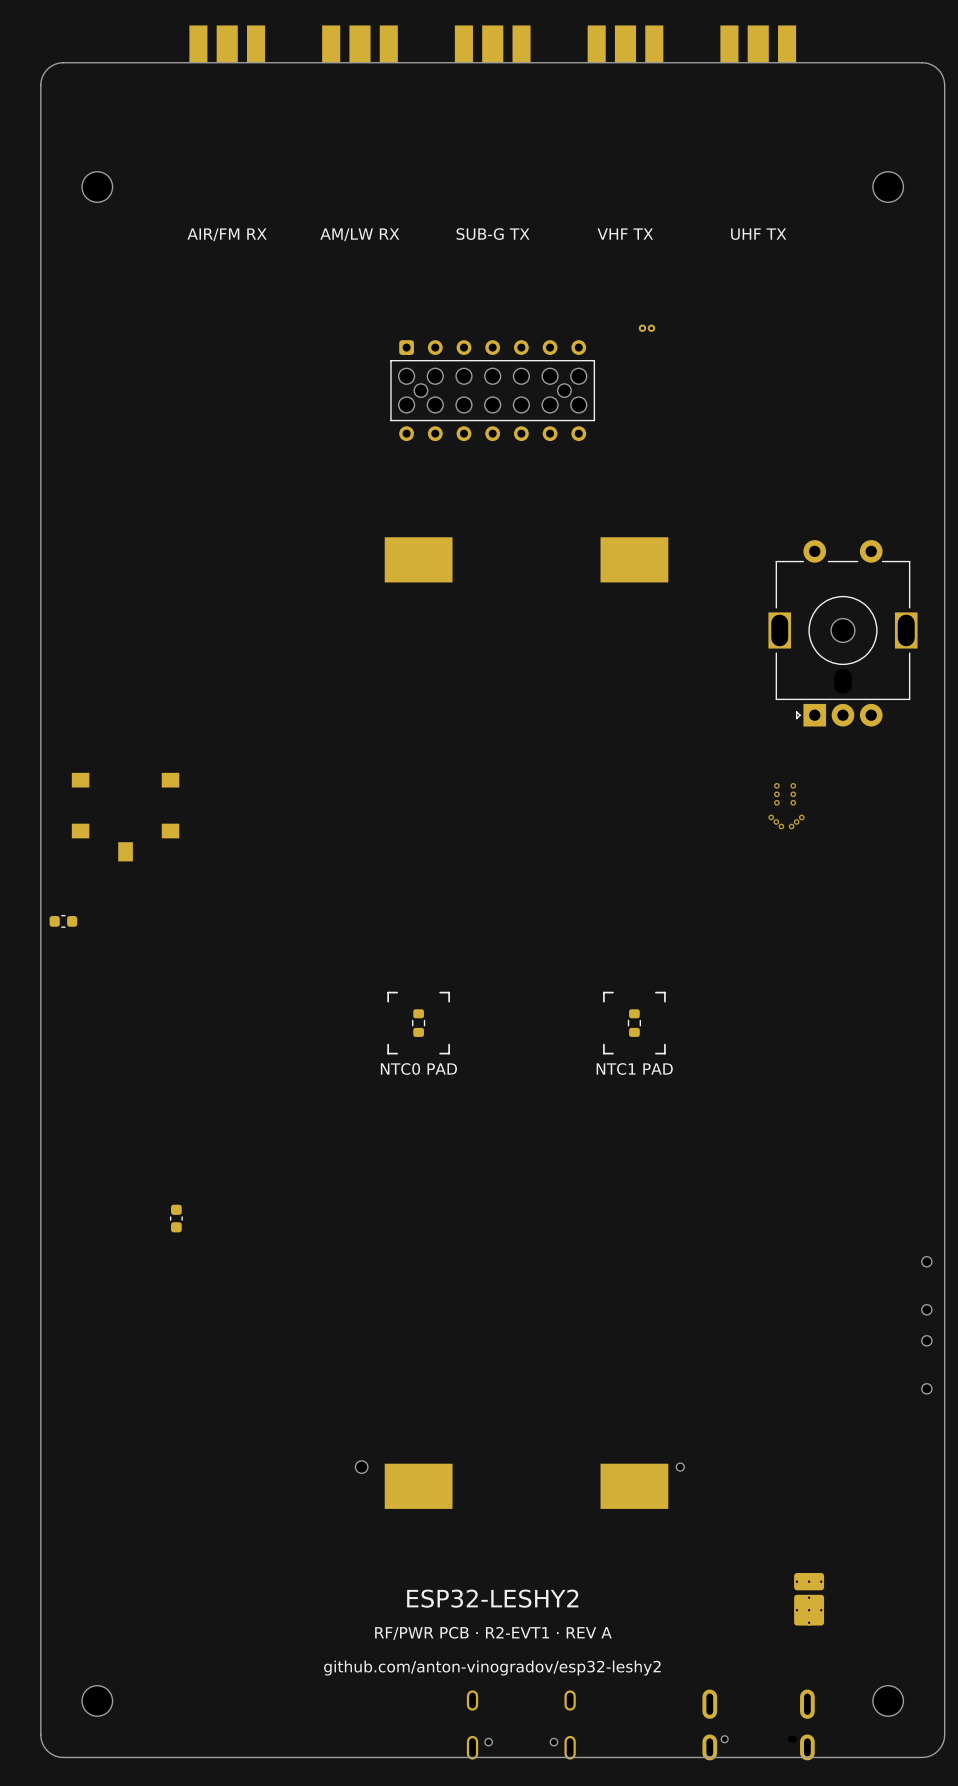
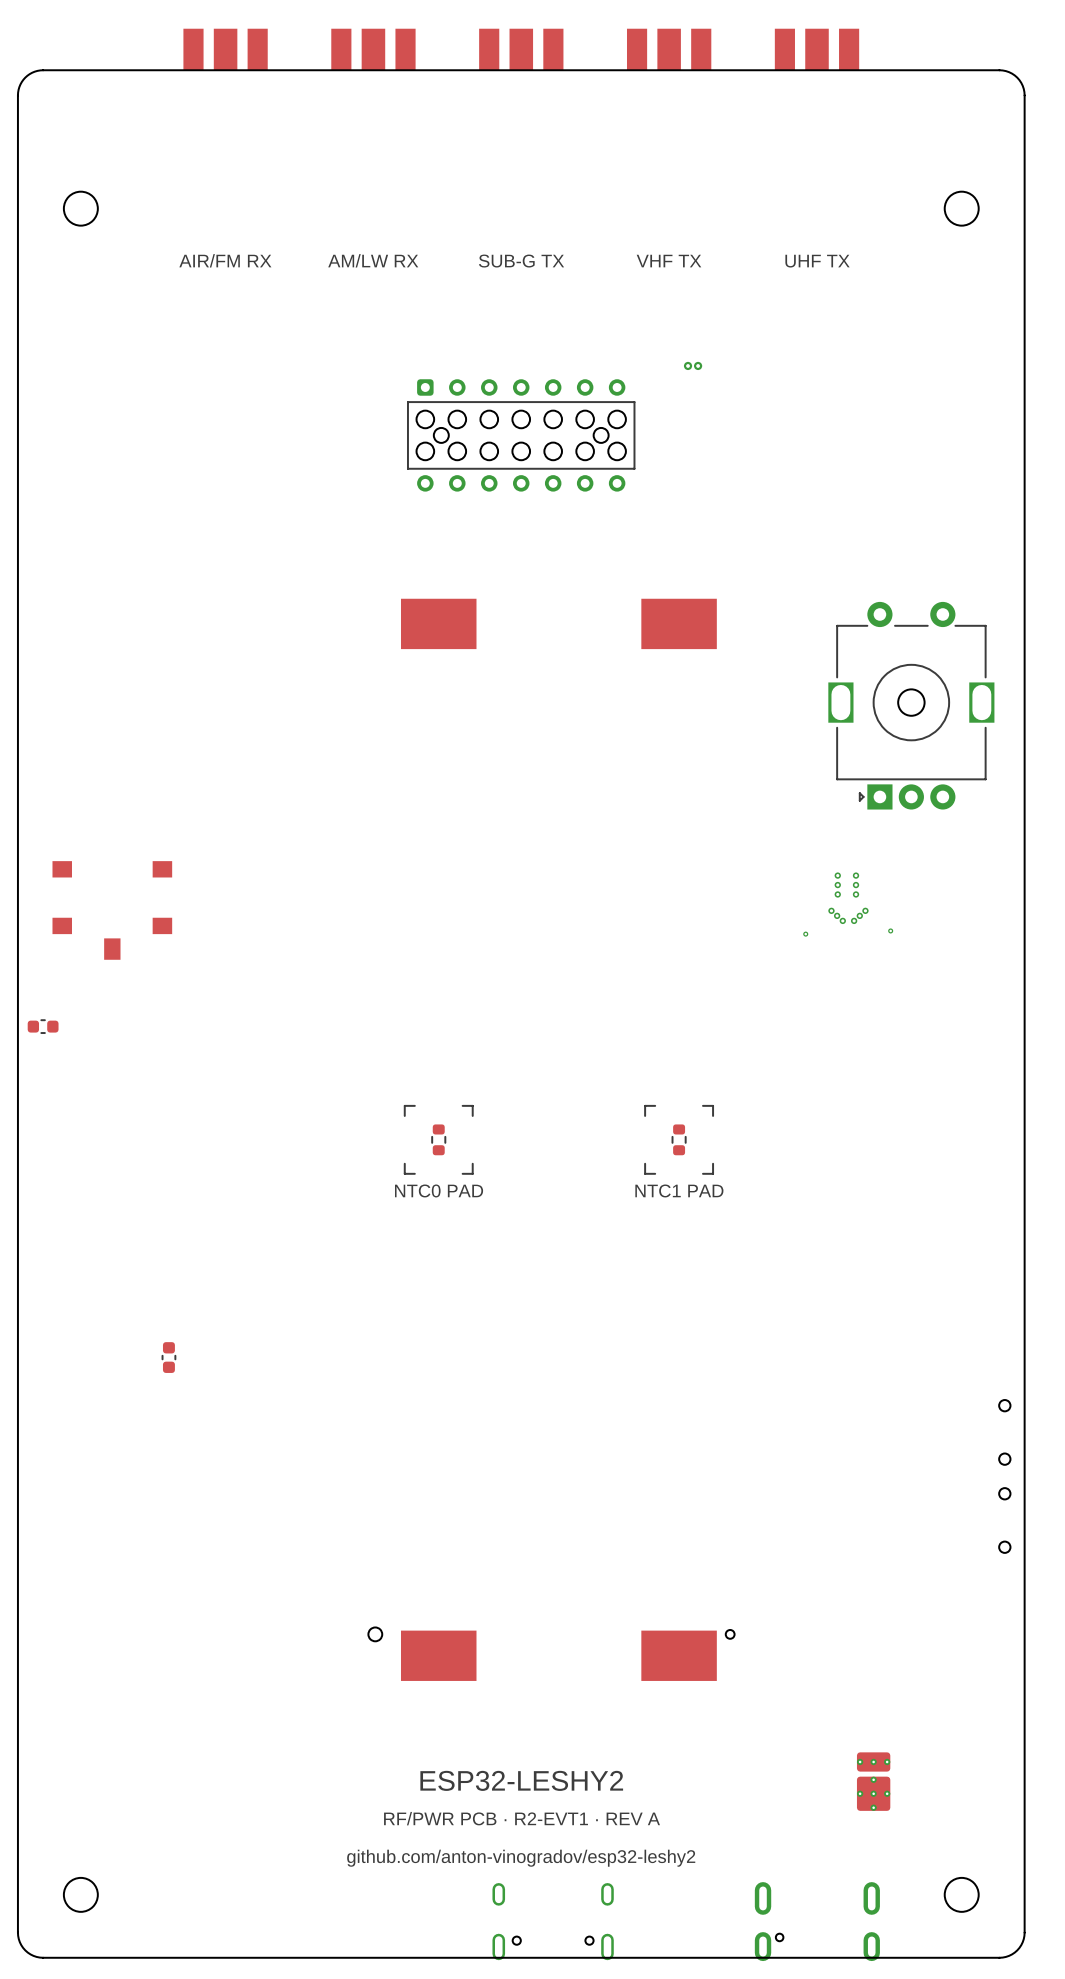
via: none -> (890, 930)
via: none -> (805, 934)

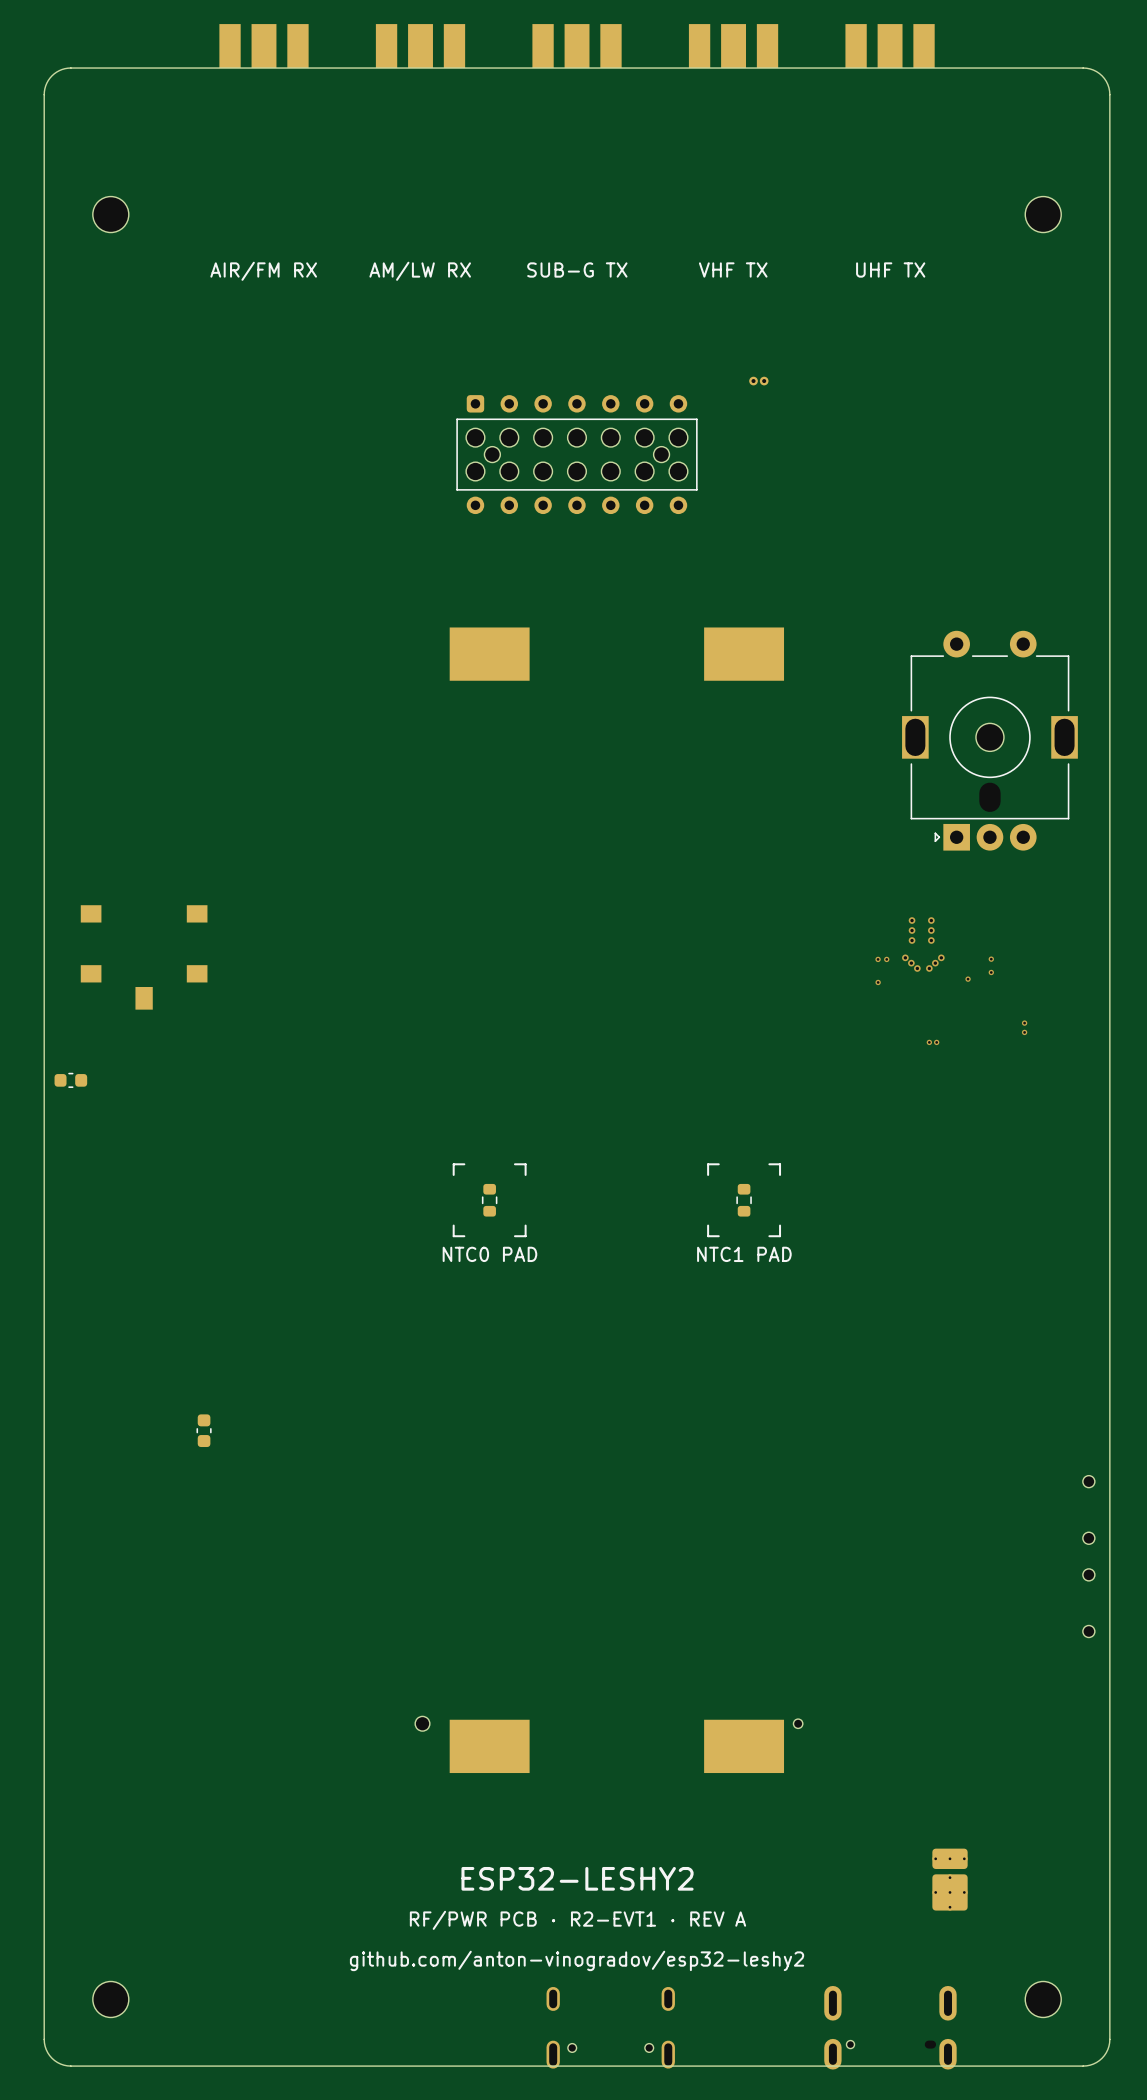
via: none -> (878, 959)
via: none -> (886, 959)
via: none -> (991, 959)
via: none -> (991, 972)
via: none -> (1024, 1023)
via: none -> (1024, 1032)
via: none -> (929, 1042)
via: none -> (936, 1042)

